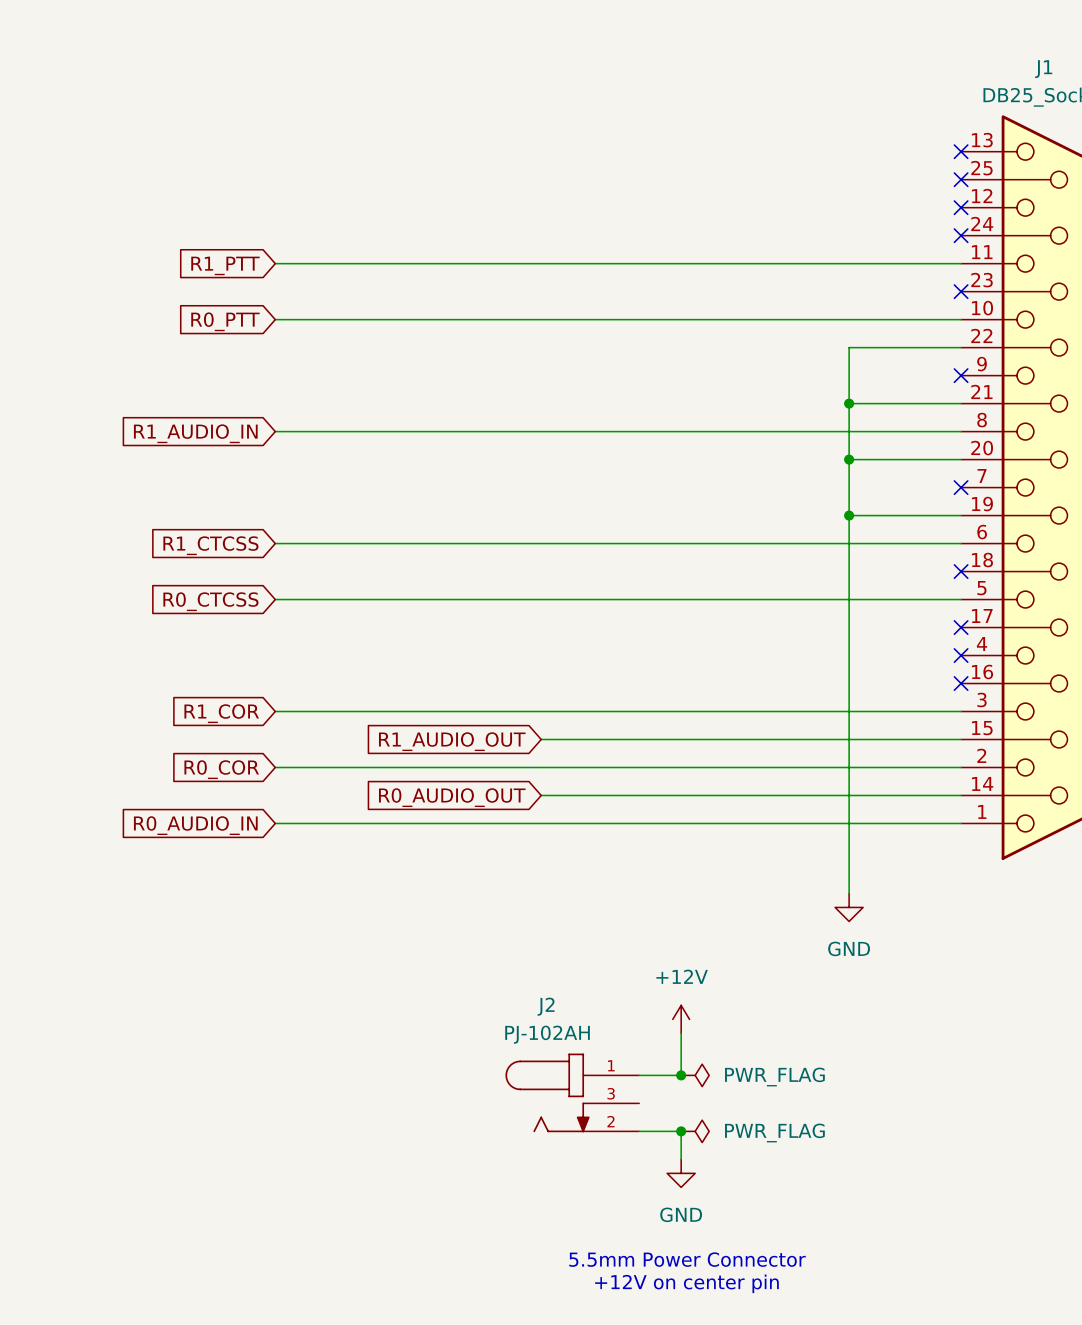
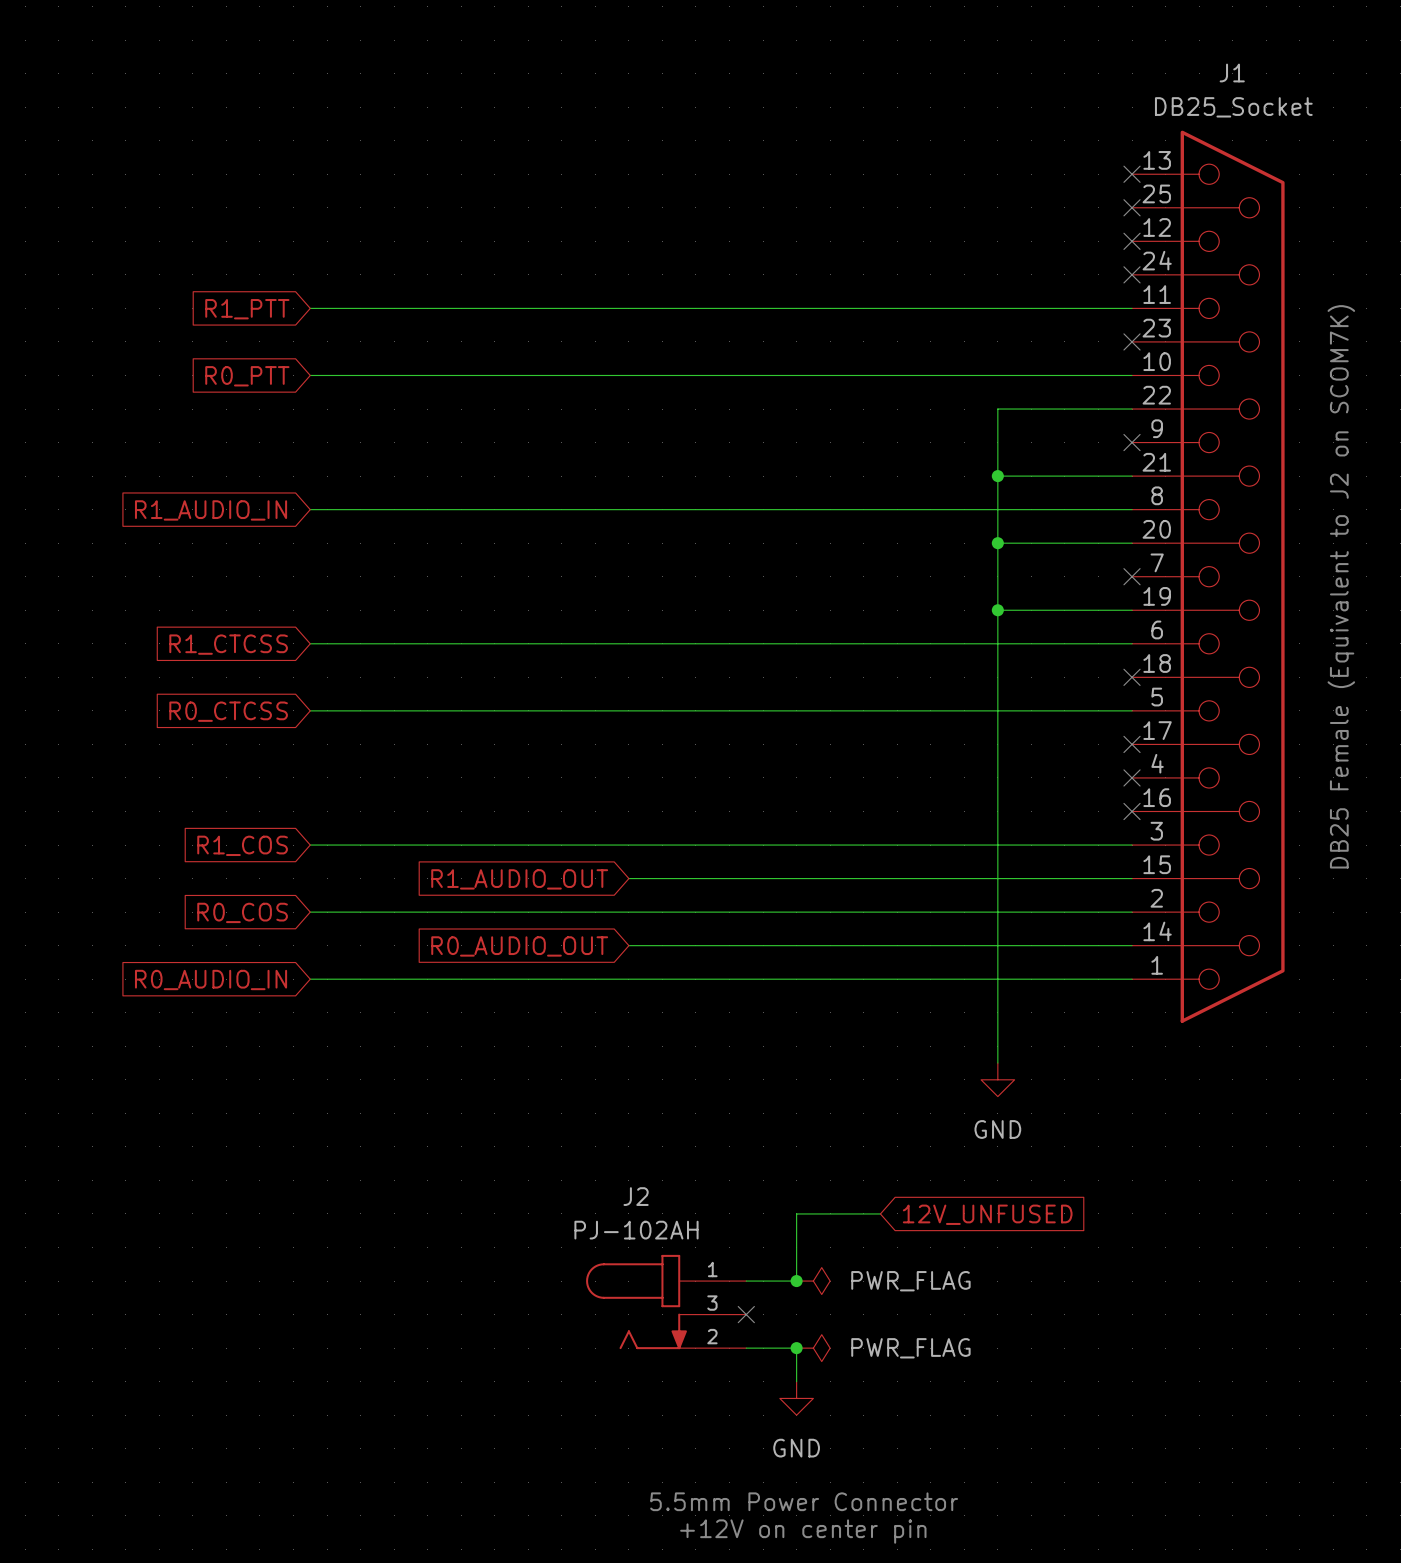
global label: R1_COR (221, 713) -> R1_COS (242, 845)
global label: R0_COR (221, 769) -> R0_COS (242, 912)
power symbol: +12V (681, 1019) -> none
wire: none -> (880, 1213) (796, 1213) (796, 1230)
global label: none -> 12V_UNFUSED (987, 1214)
no-connect mark: none -> (746, 1314)

